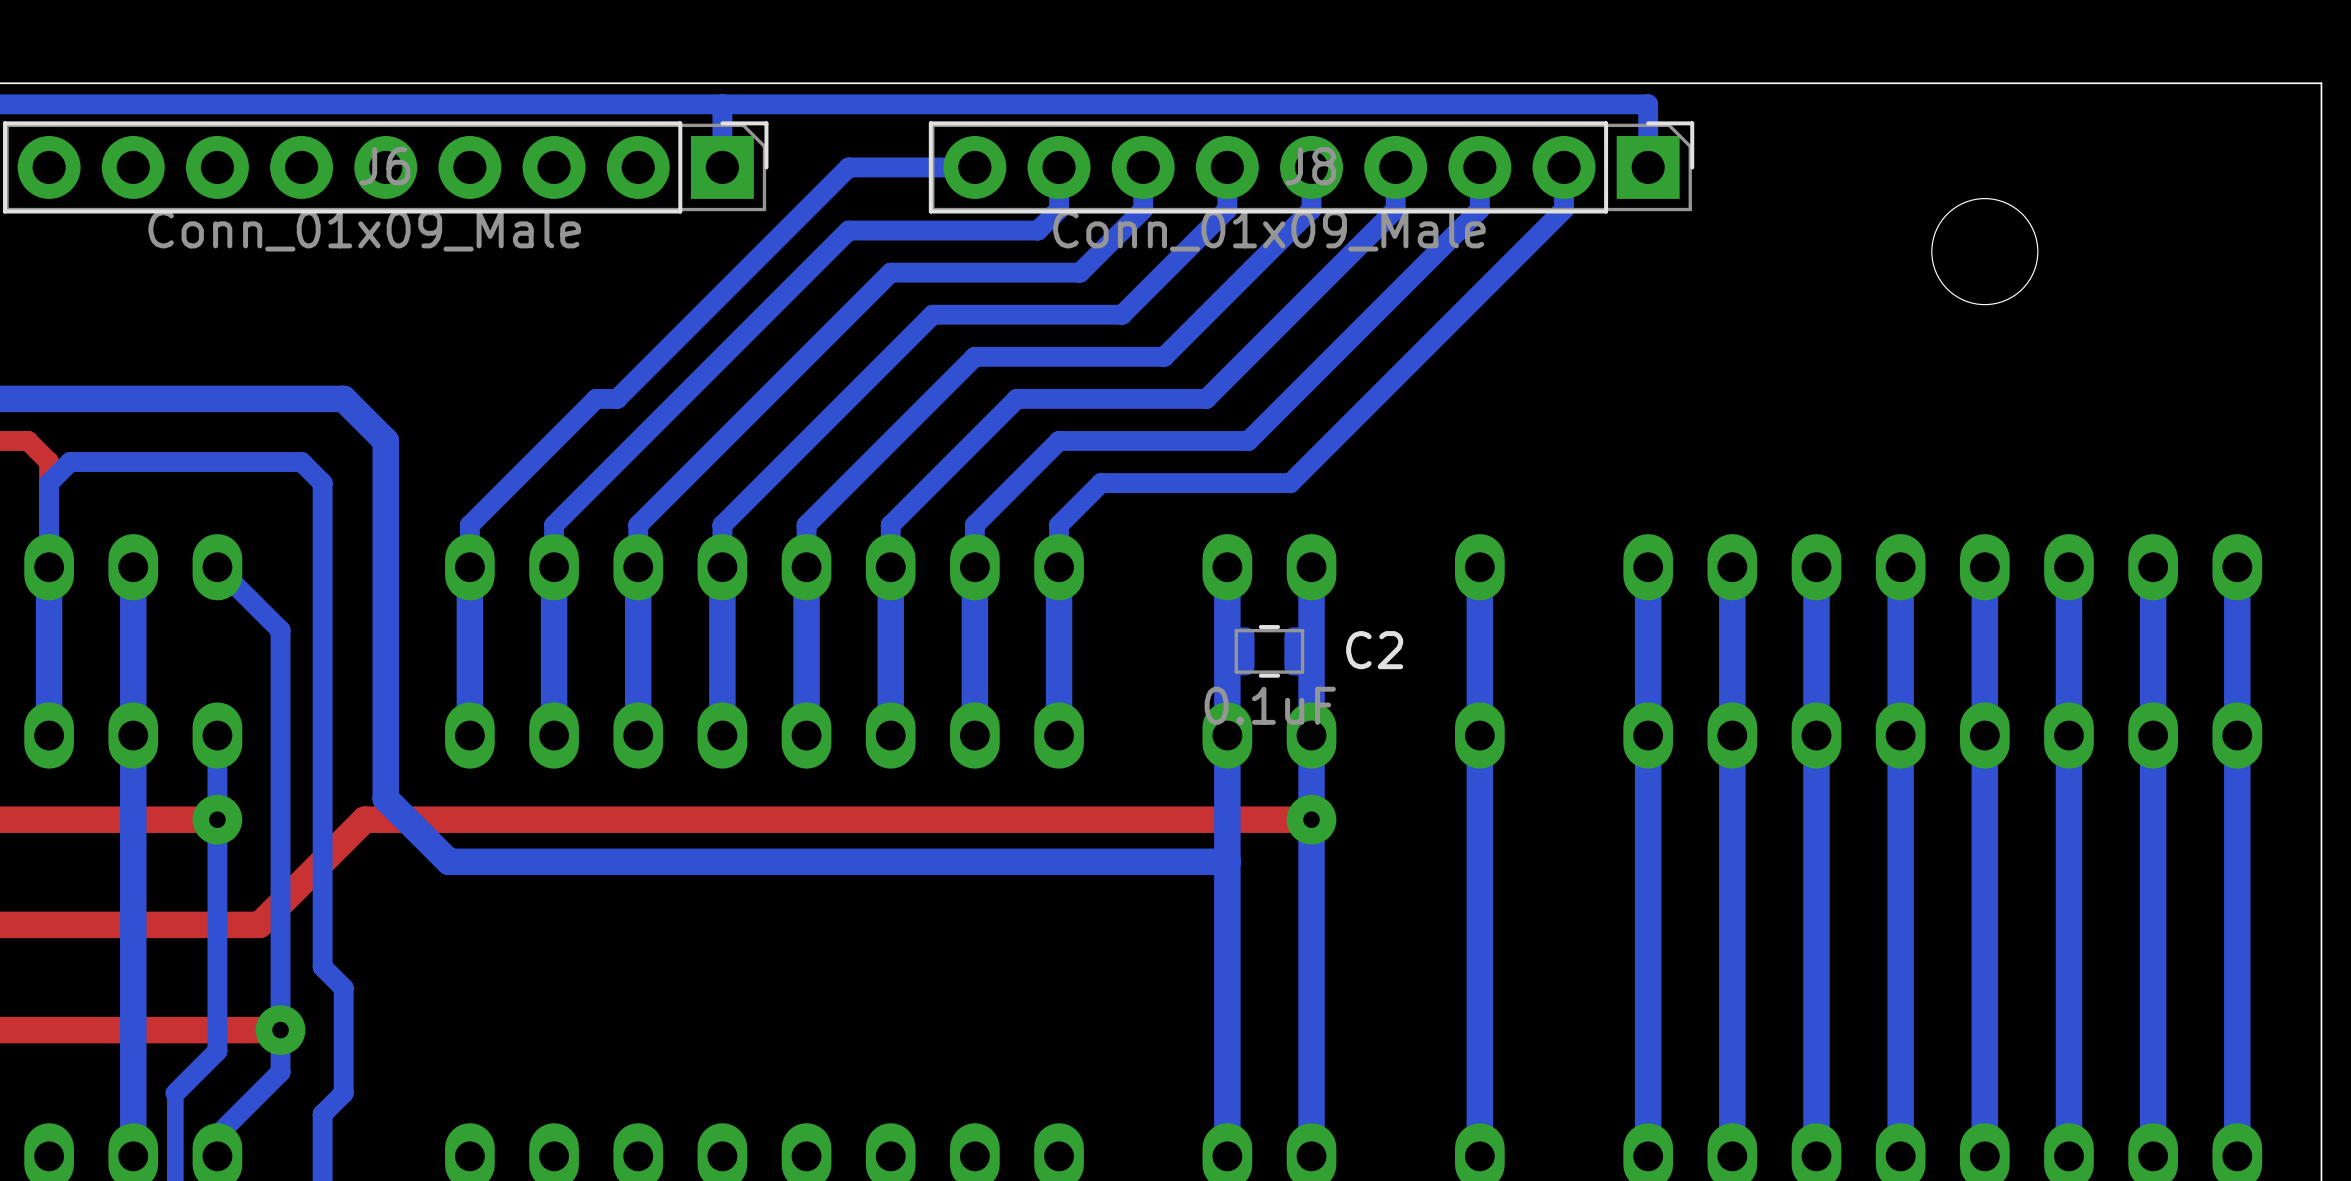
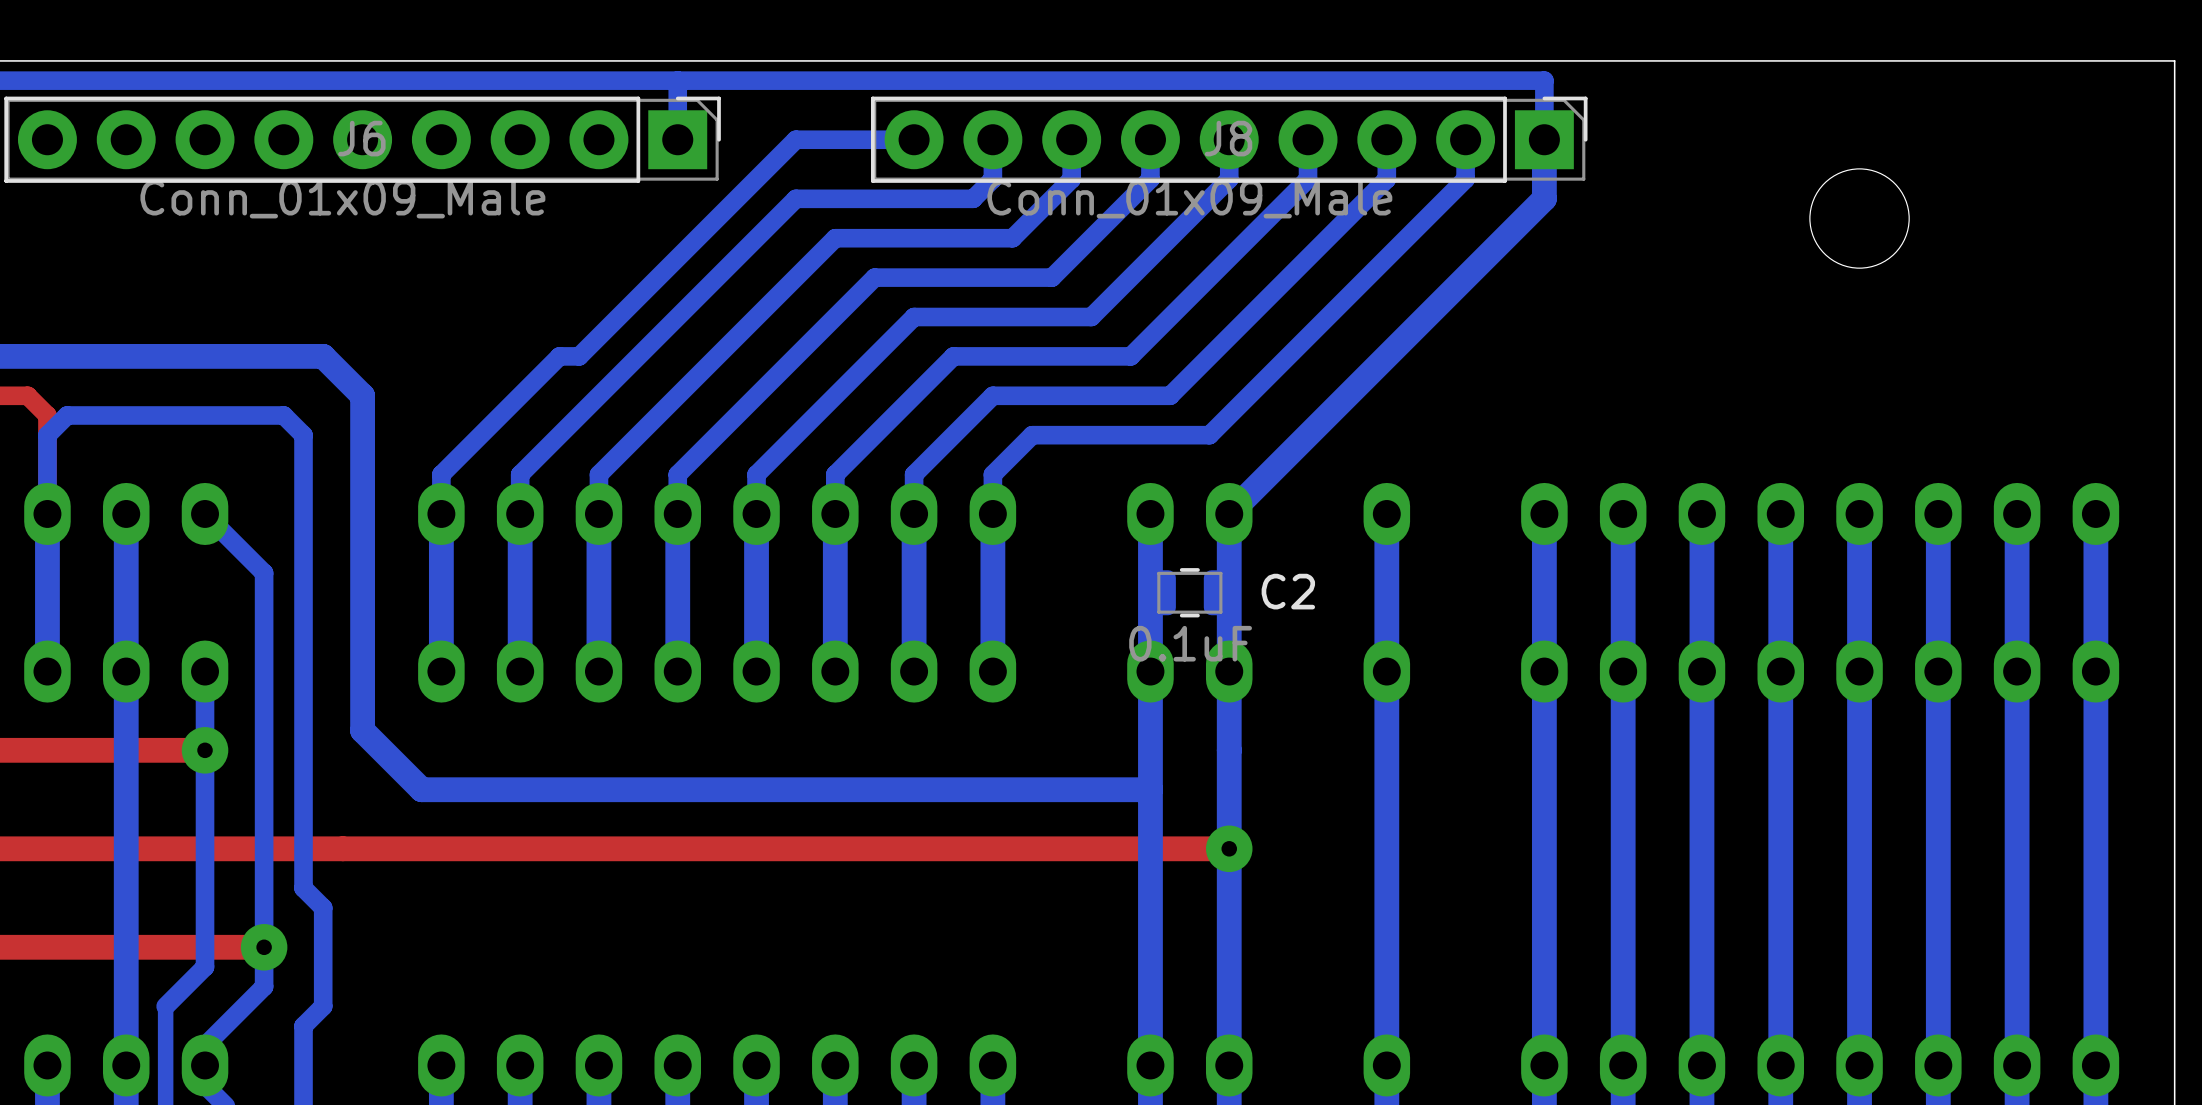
bottom track: none -> (1544, 139) (1544, 198) (1229, 513)
top track: (1311, 819) (364, 819) (259, 924) -> (1229, 848) (244, 848)
via position: (1311, 819) -> (1229, 848)

